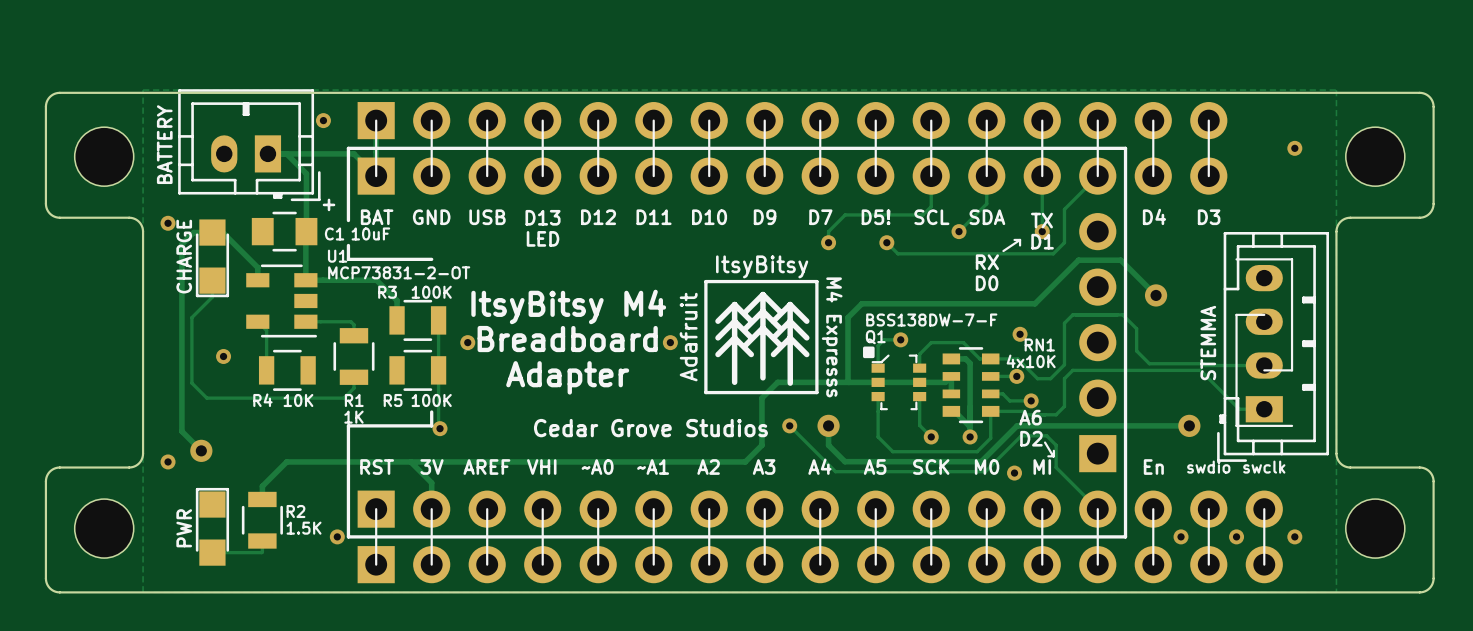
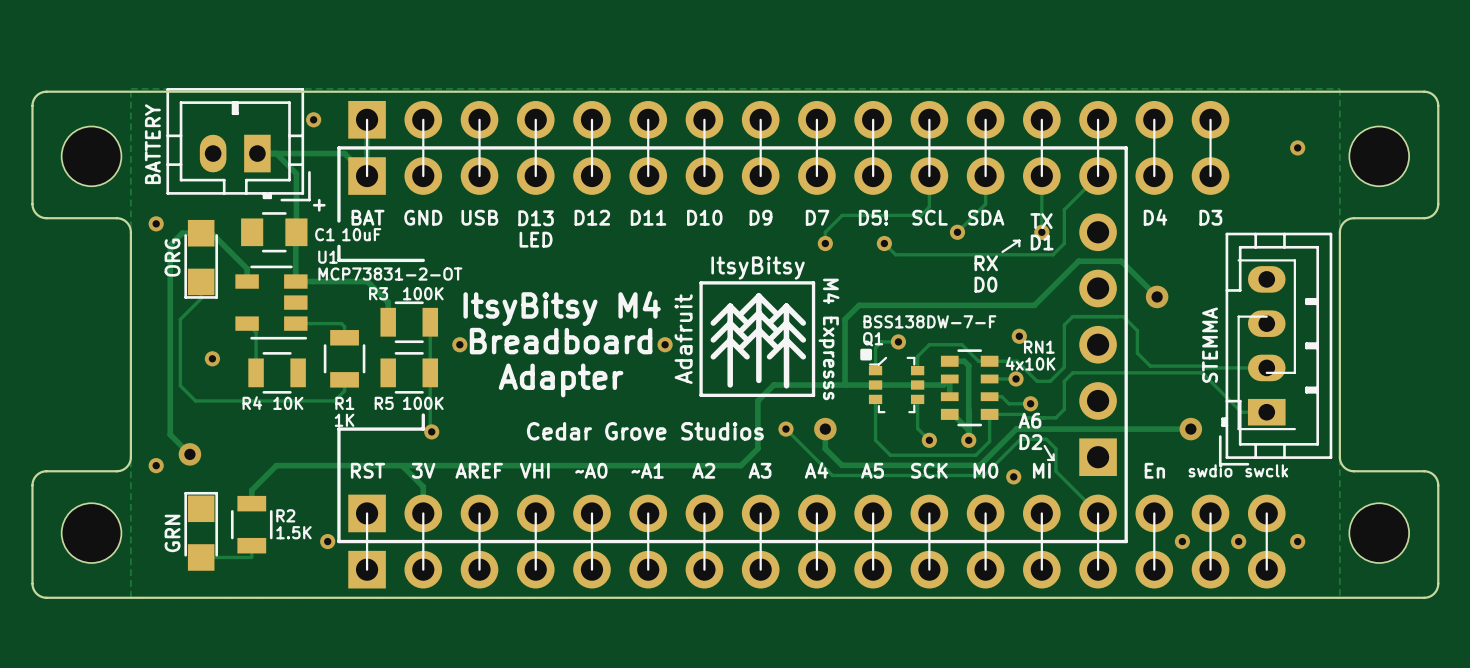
part value: CHARGE (184, 256) -> ORG (172, 257)
part value: PWR (184, 528) -> GRN (172, 533)

